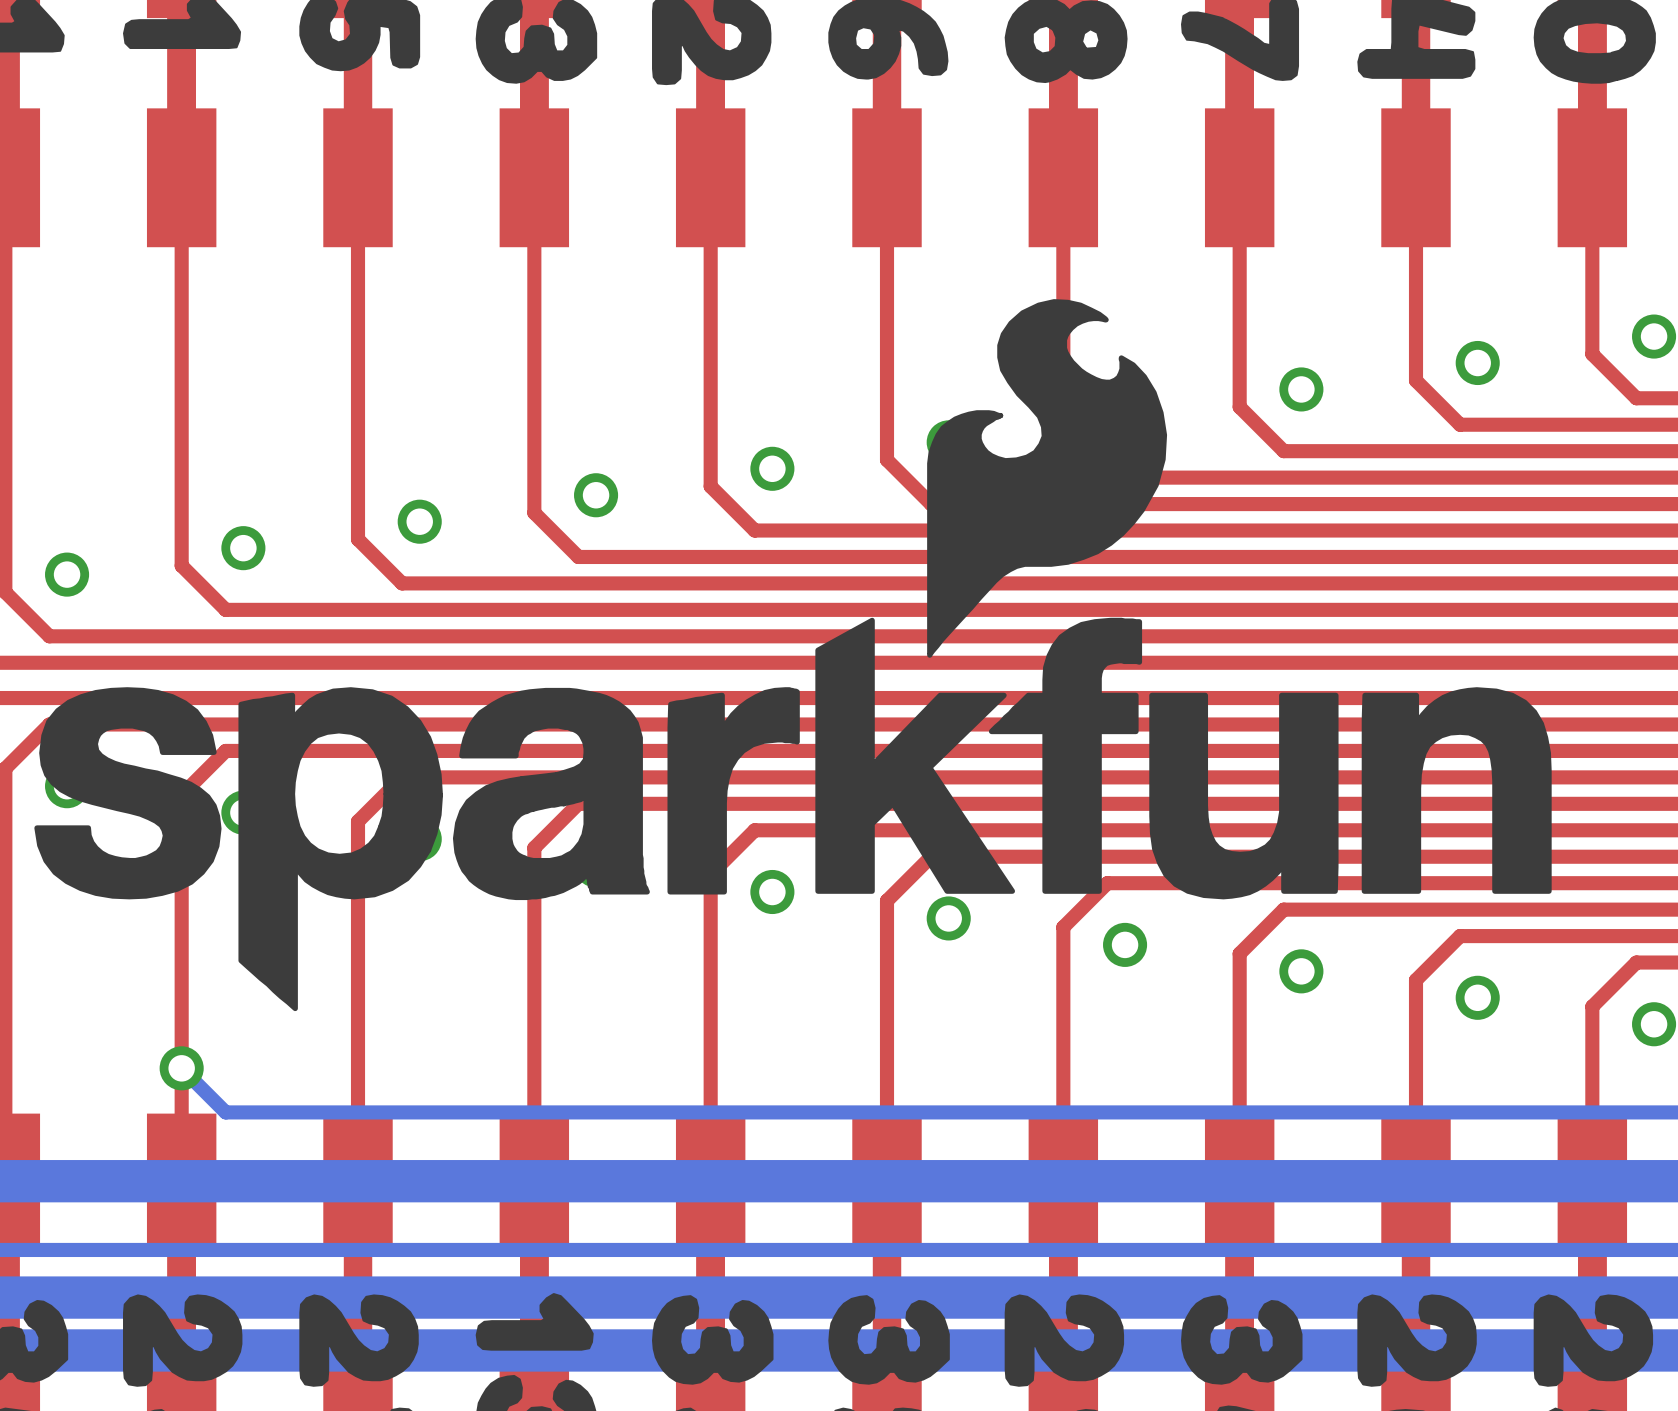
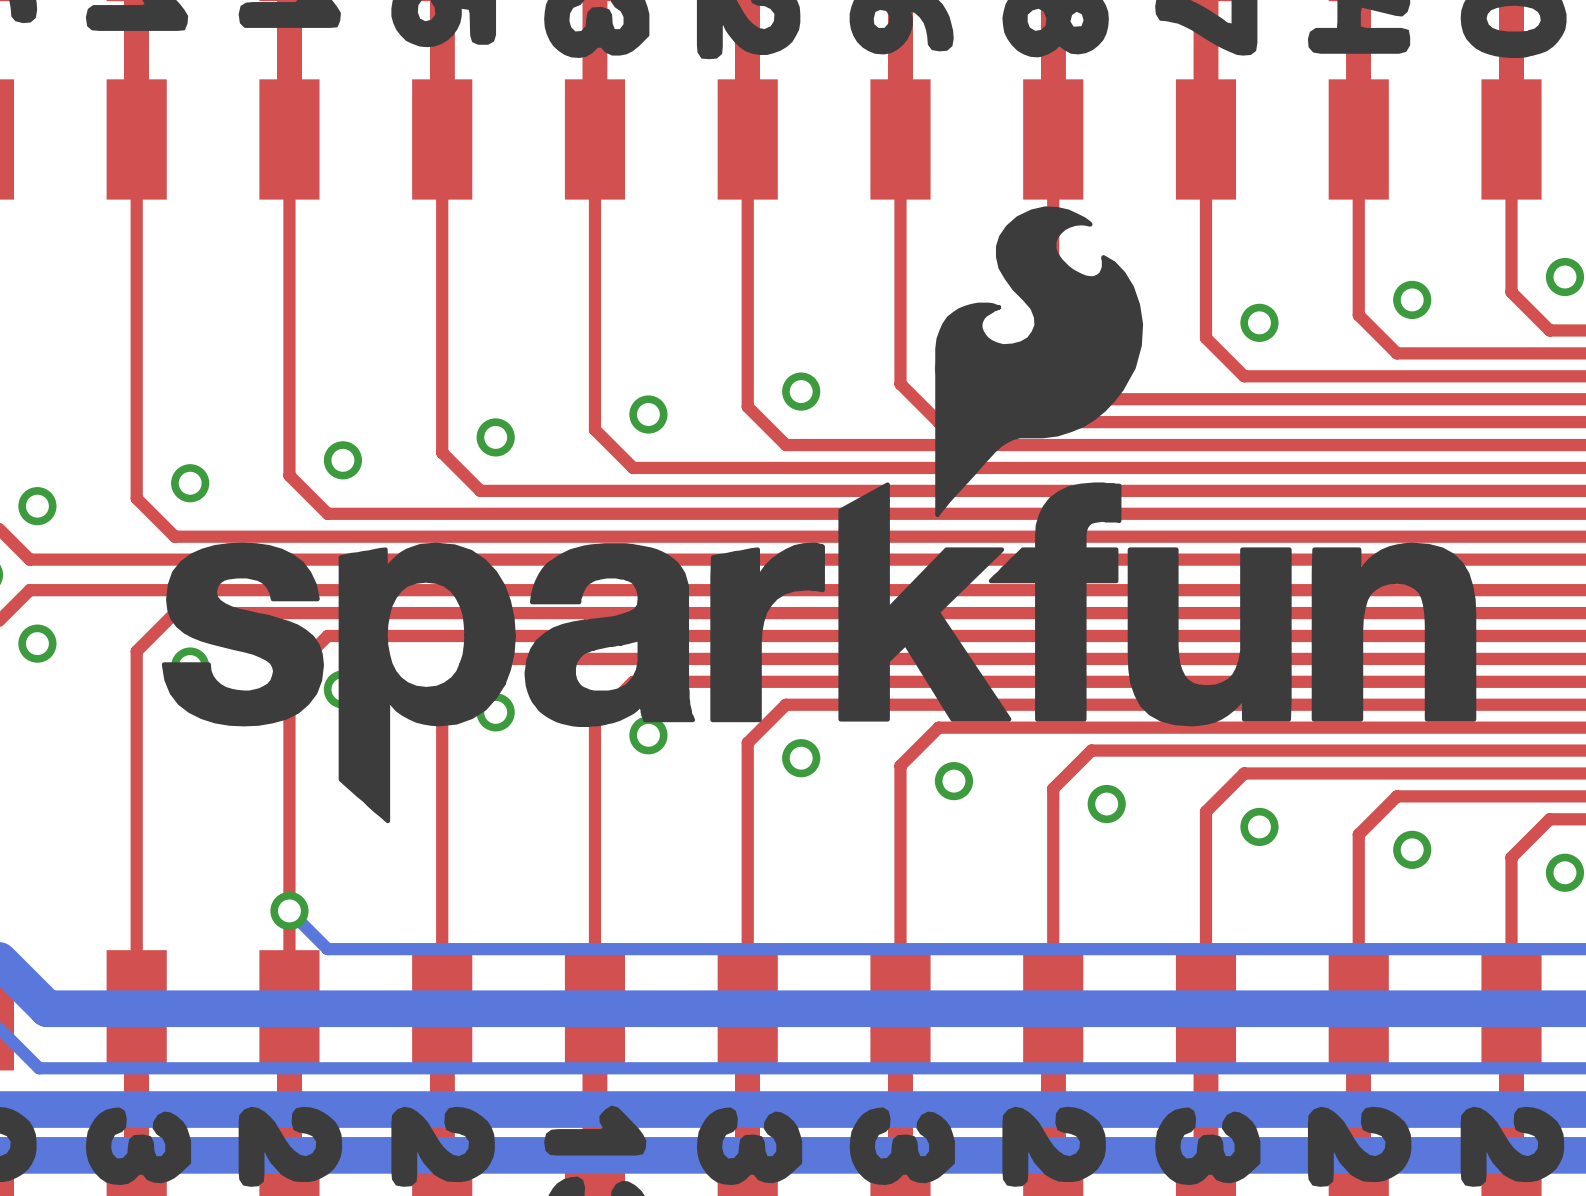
drawing position: (793, 655) -> (819, 514)

